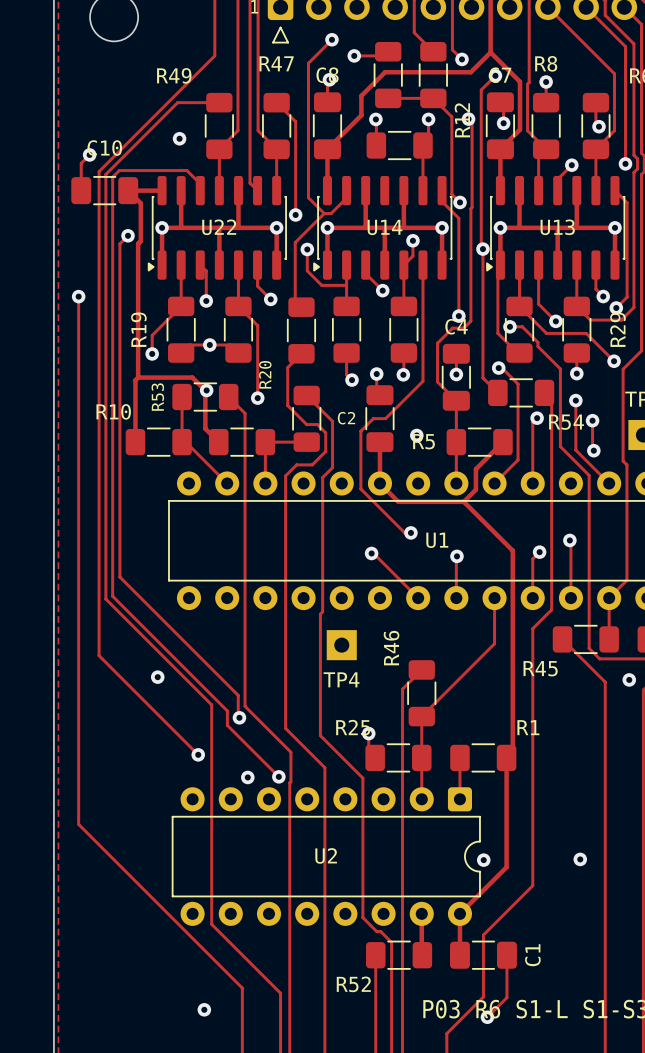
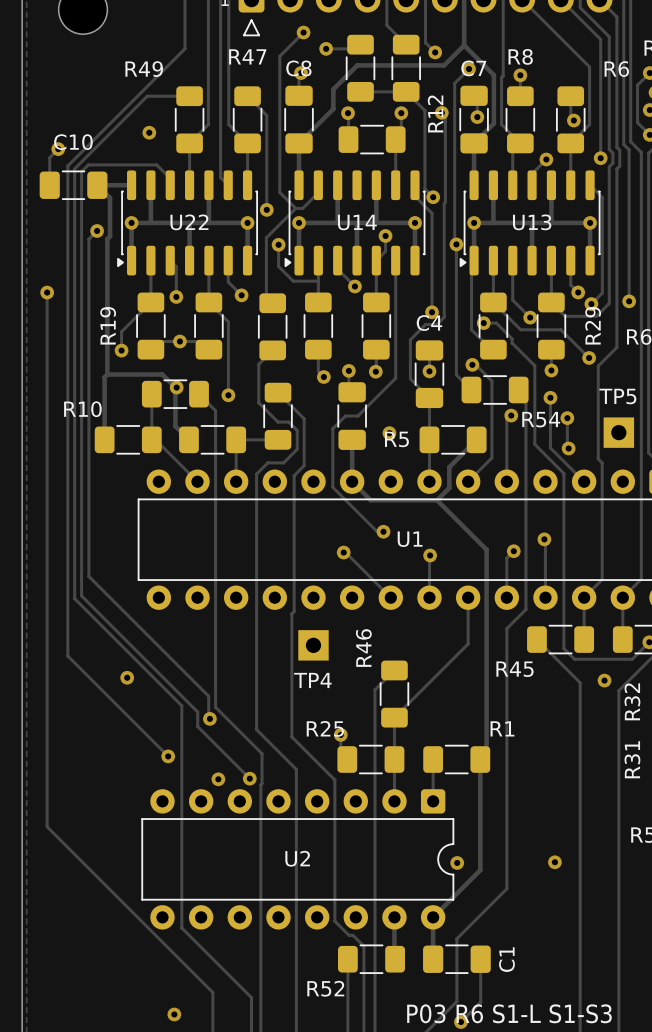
R20 name: R20 (265, 374) -> none
R53 name: R53 (157, 397) -> none
C2 name: C2 (346, 418) -> none

